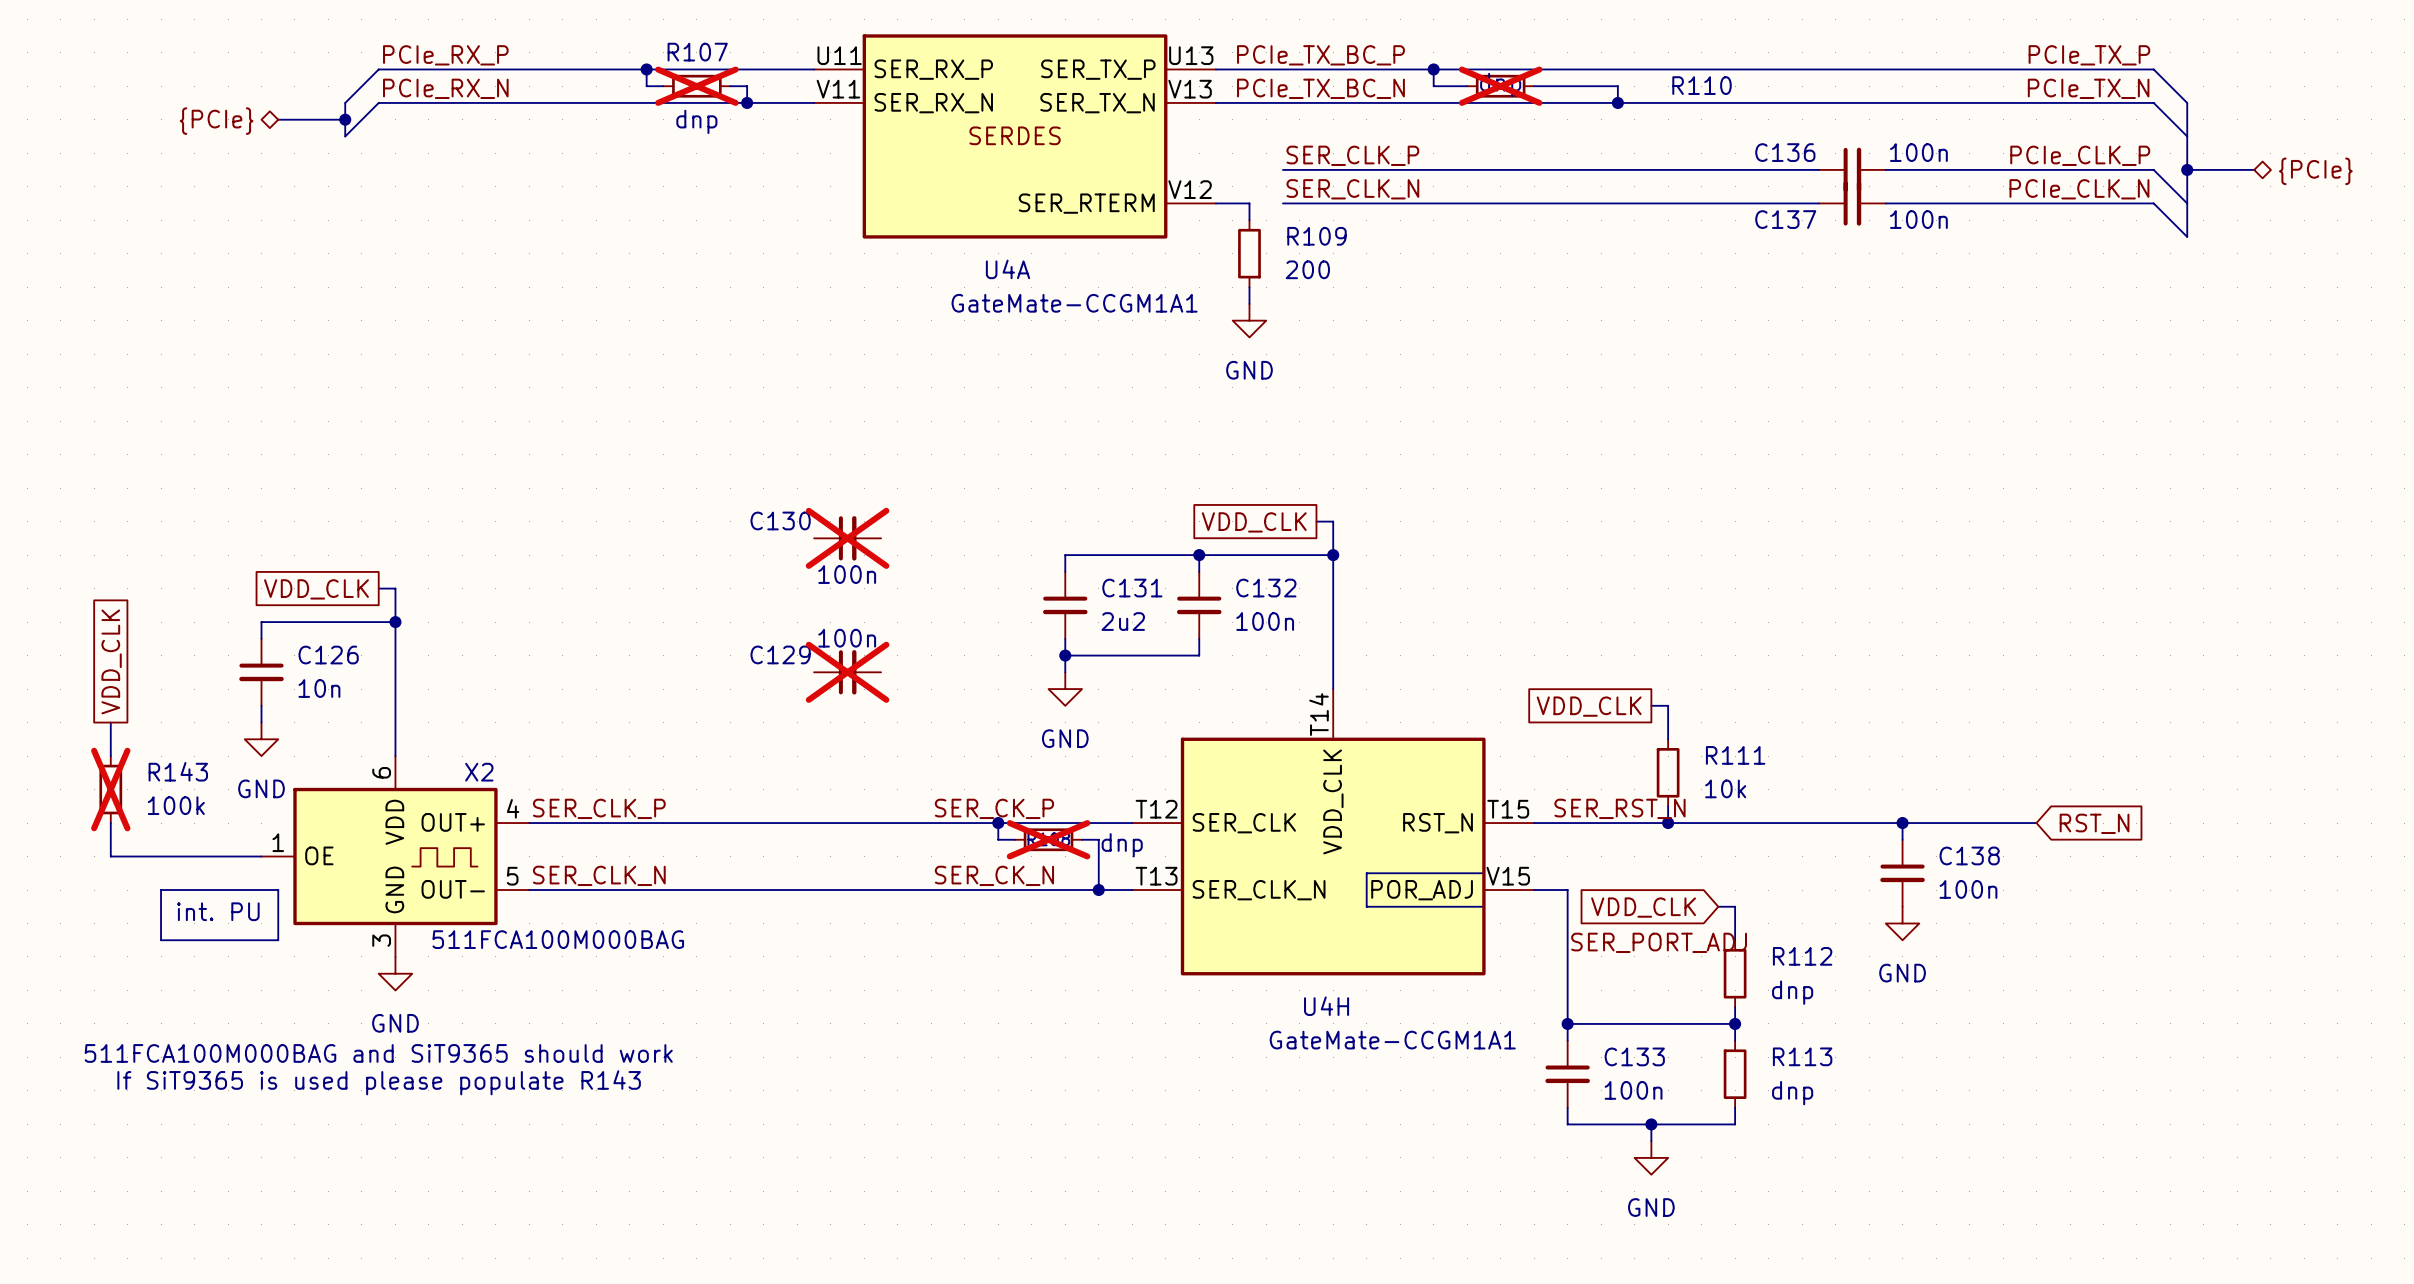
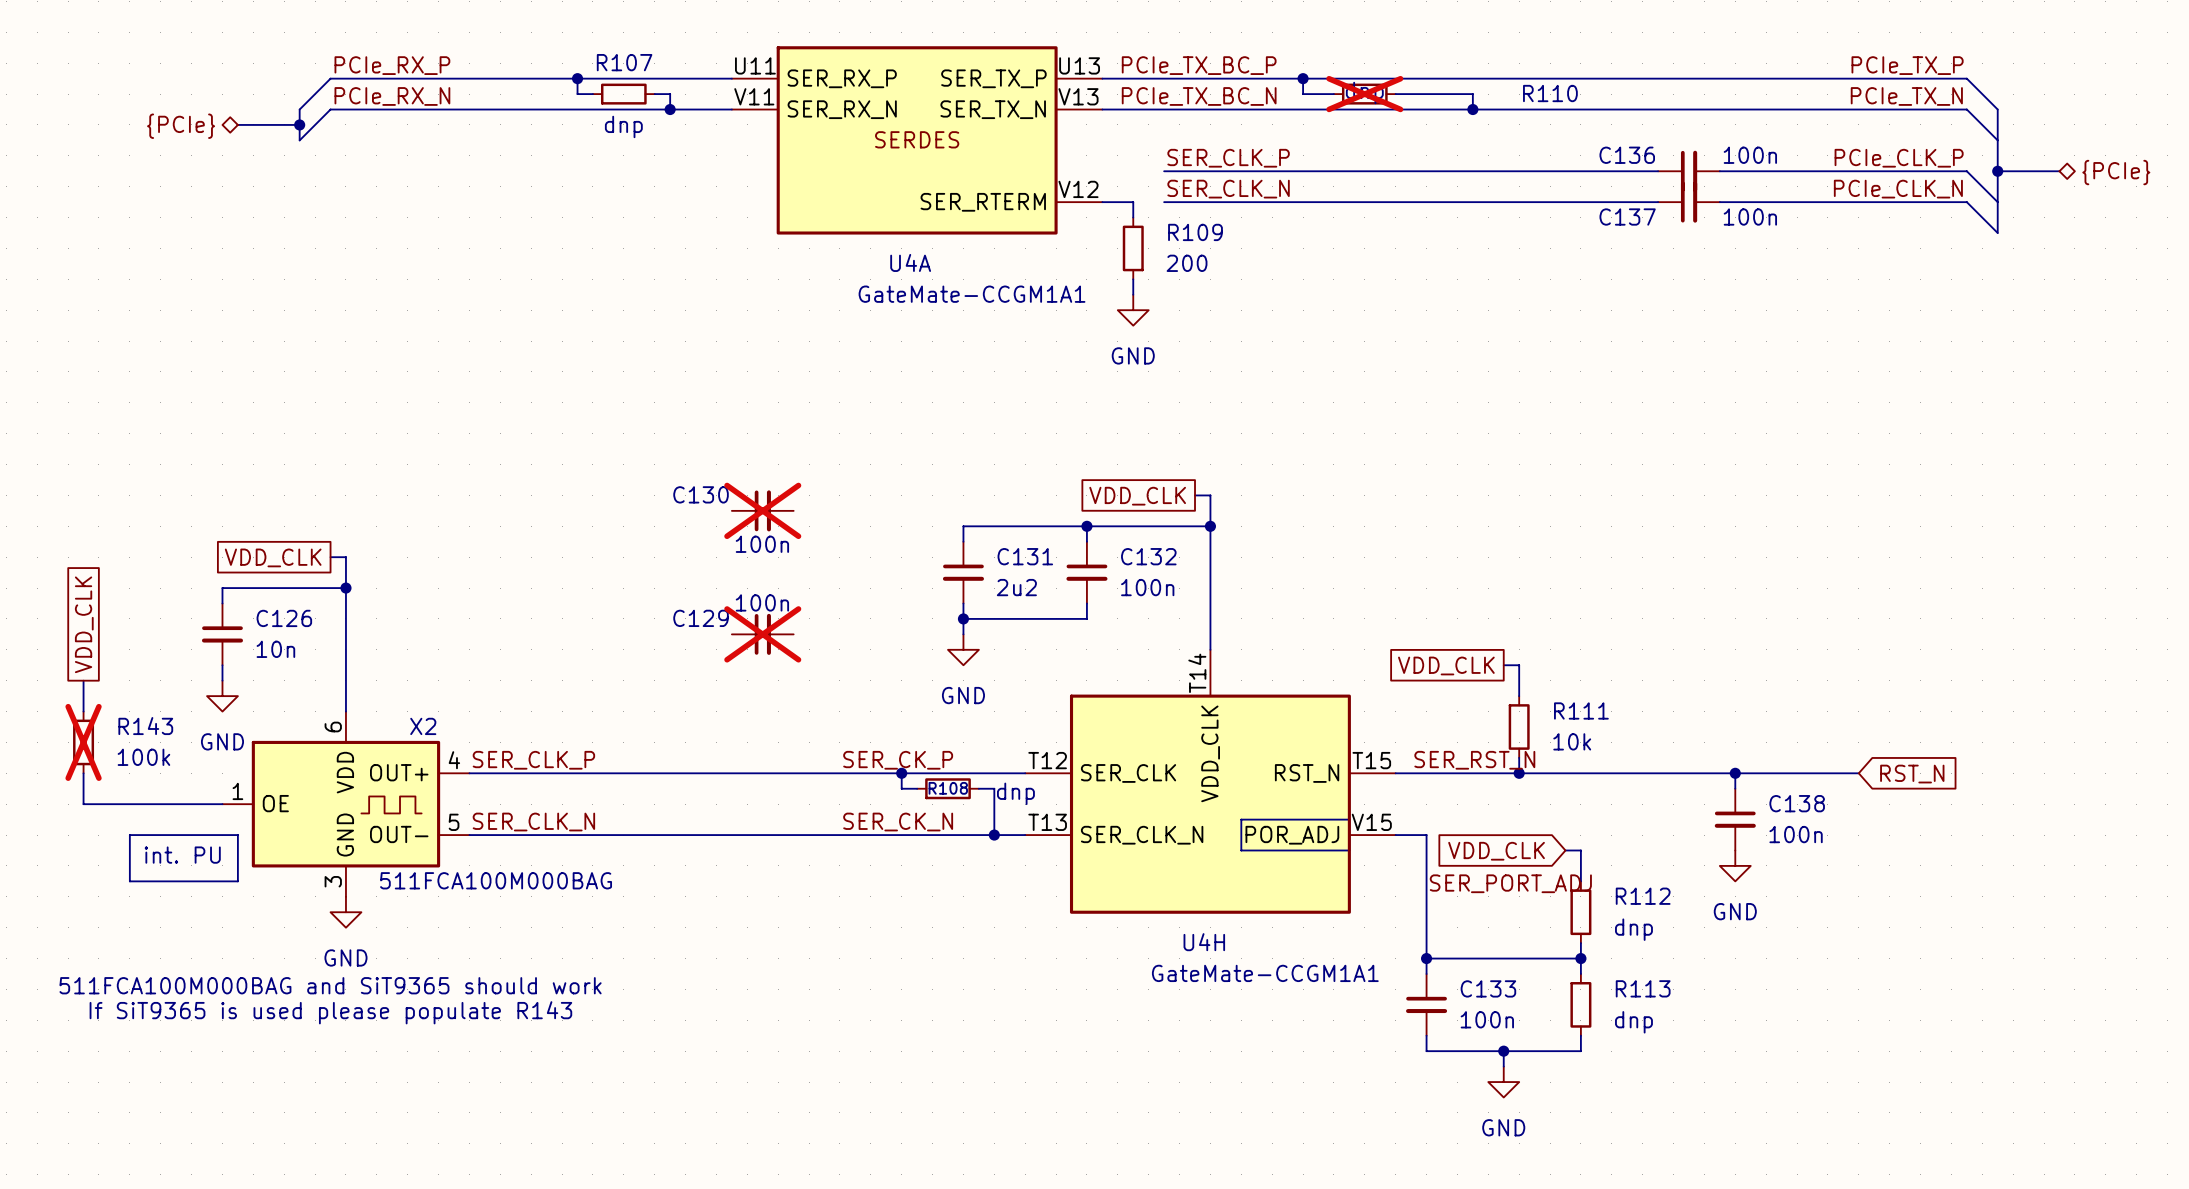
R107 do-not-place cross: (696, 86) -> none
R108 do-not-place cross: (1048, 839) -> none

